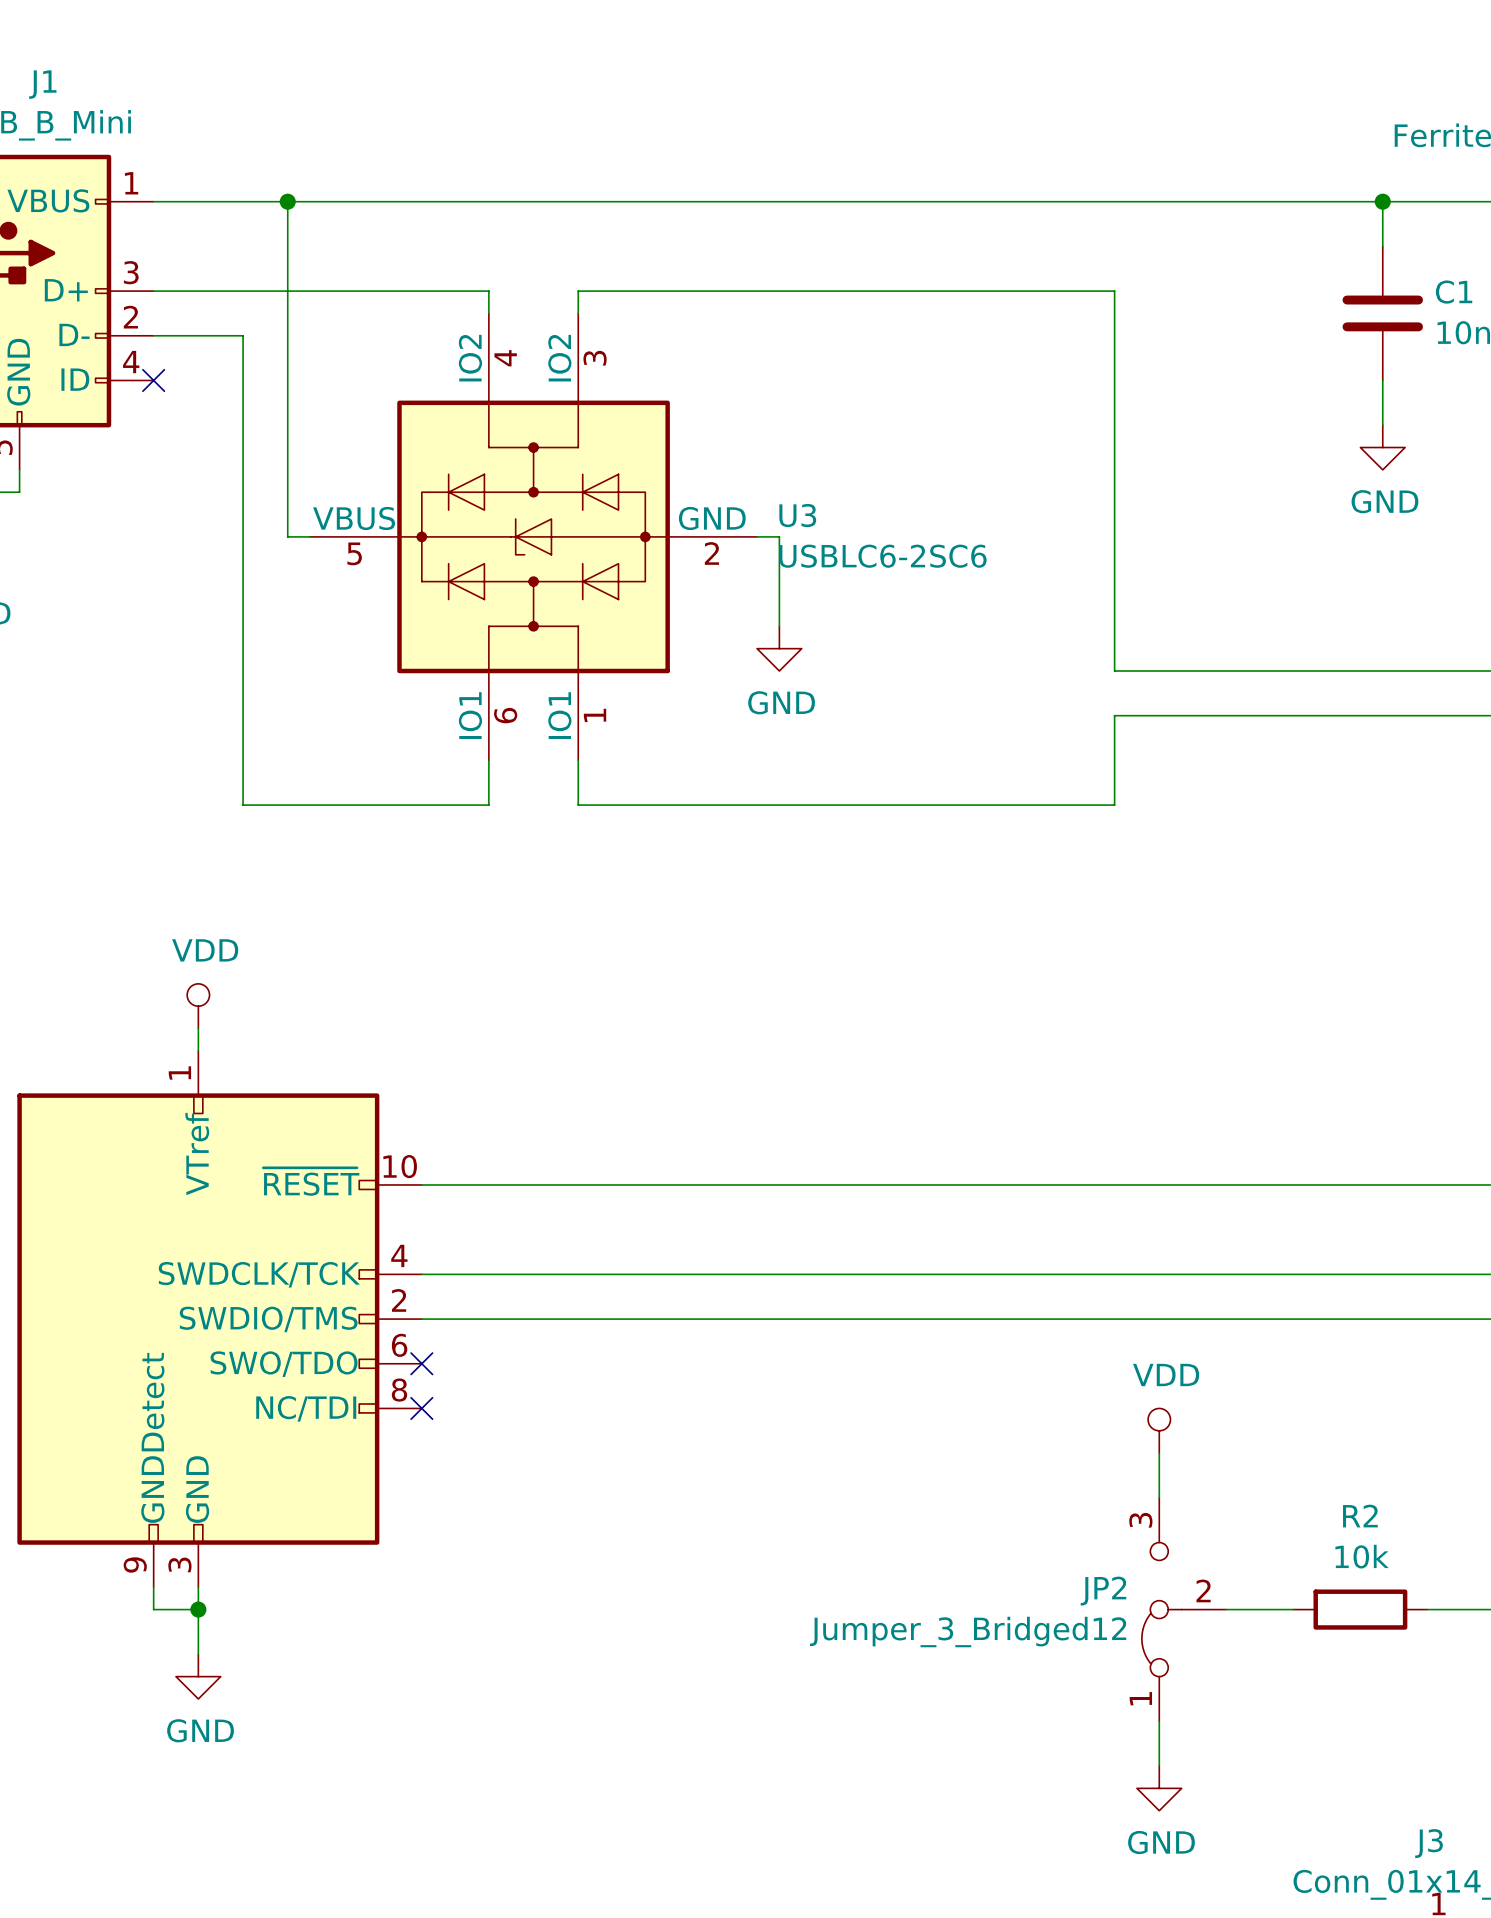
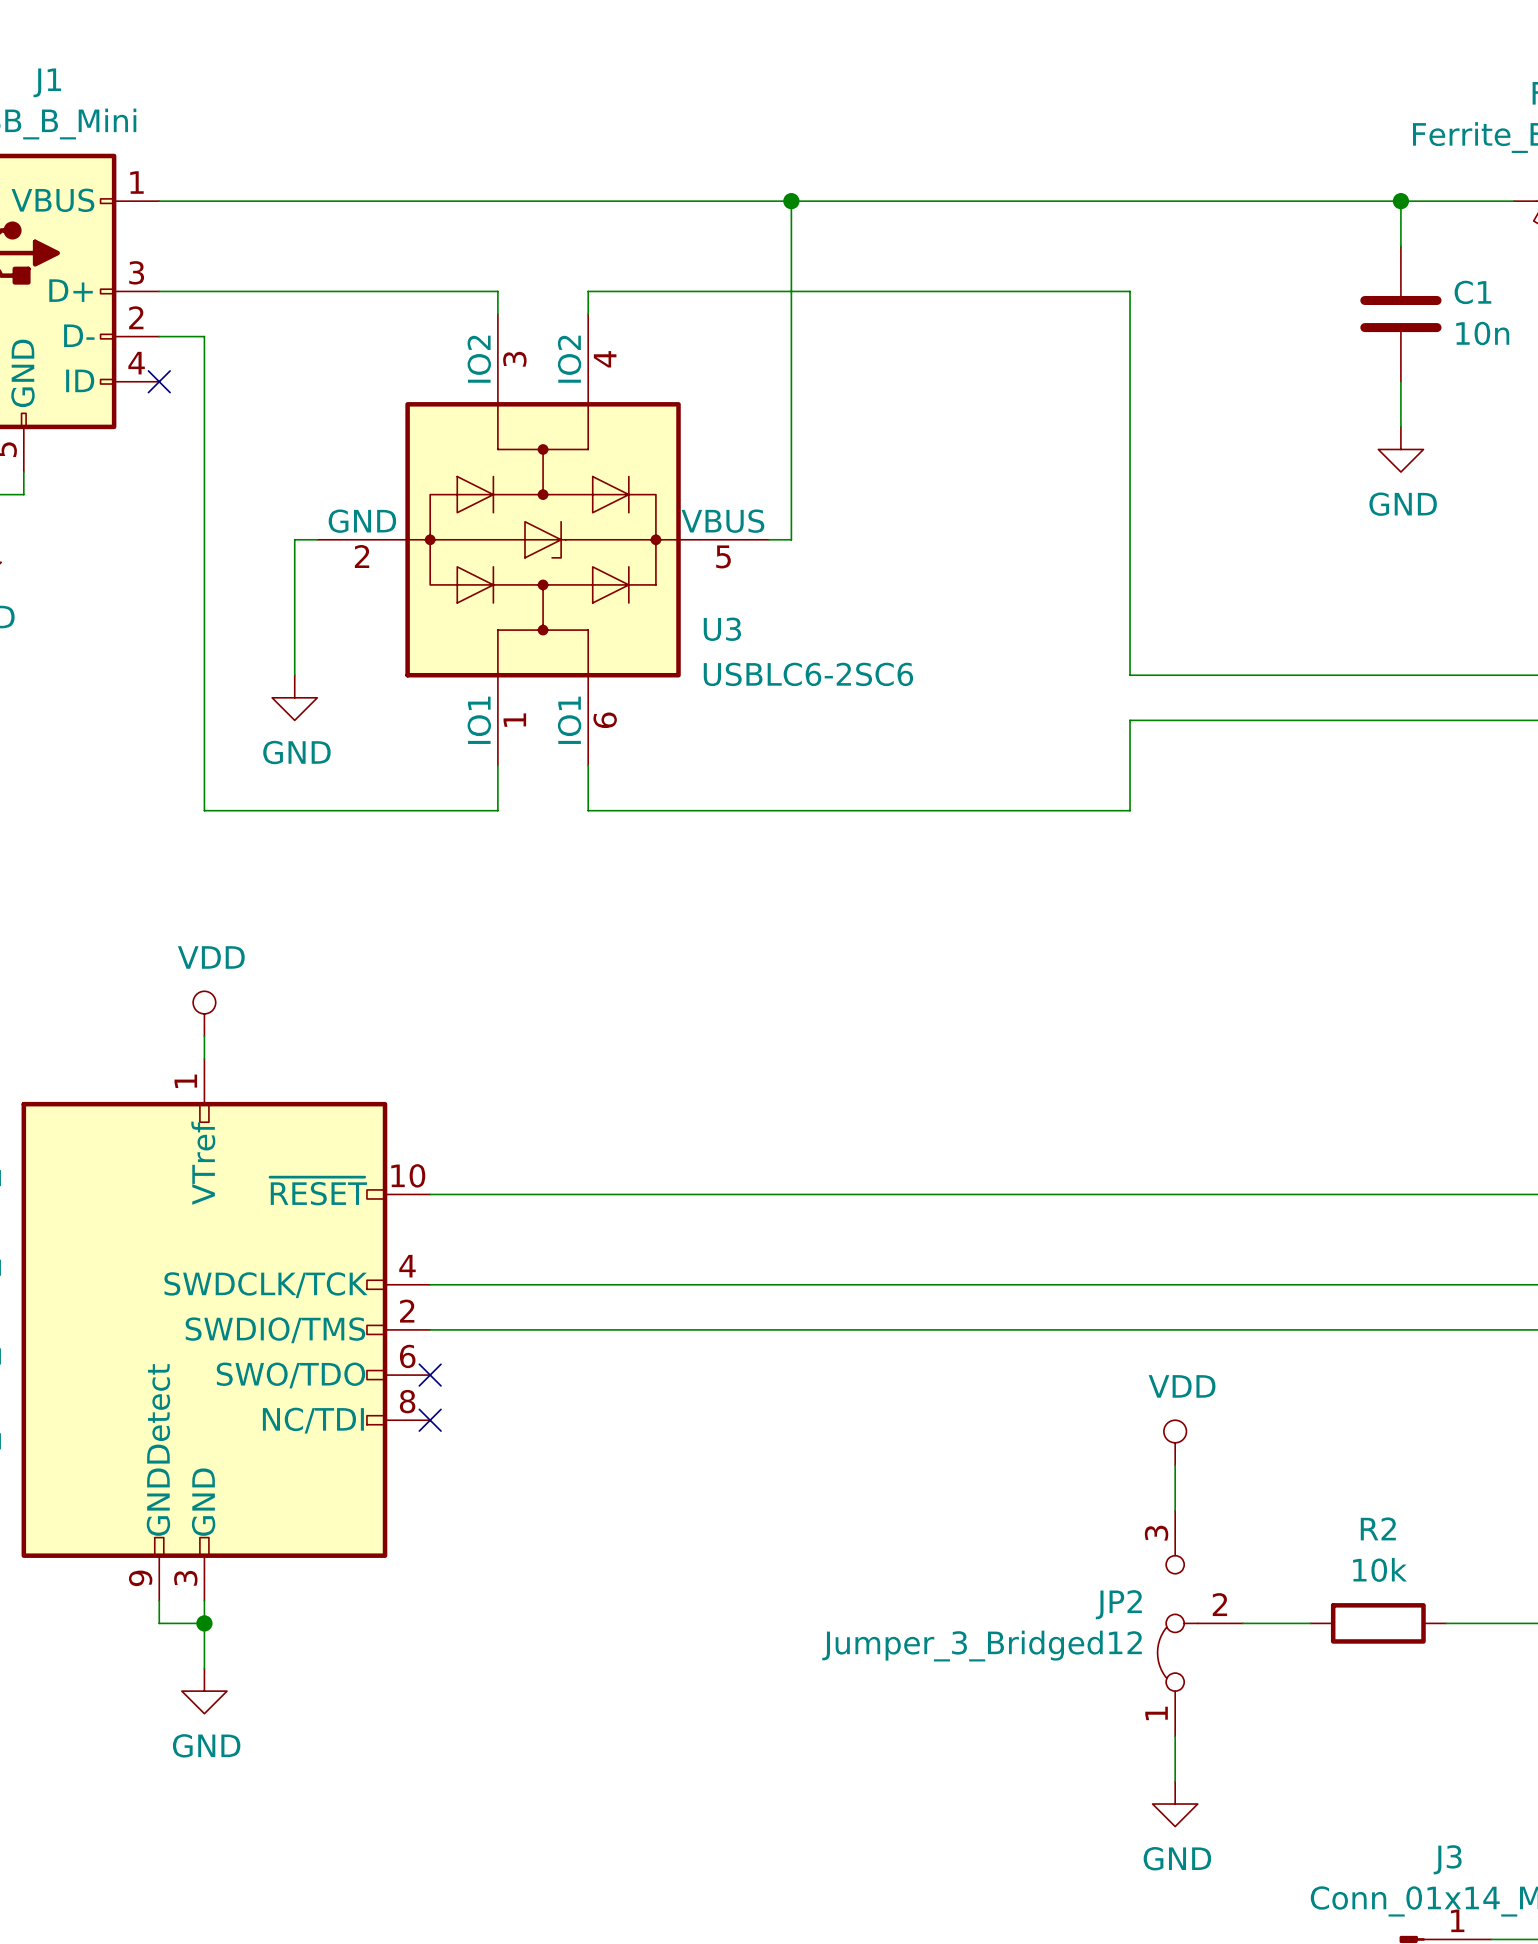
wire: (287, 201) (287, 536) -> (294, 675) (294, 539)
junction: (287, 201) -> none
junction: none -> (791, 201)
wire: (198, 335) (243, 335) (243, 805) -> (204, 336) (204, 810) (249, 810)
U3 name position: U3 (797, 515) -> U3 (722, 629)
U3 flip: as is (533, 536) -> left-right (543, 539)
wire: (779, 536) (779, 626) -> (791, 539) (791, 201)
U3 value position: USBLC6-2SC6 (882, 556) -> USBLC6-2SC6 (808, 674)
power symbol: GND (779, 648) -> none
power symbol: none -> GND (294, 697)

